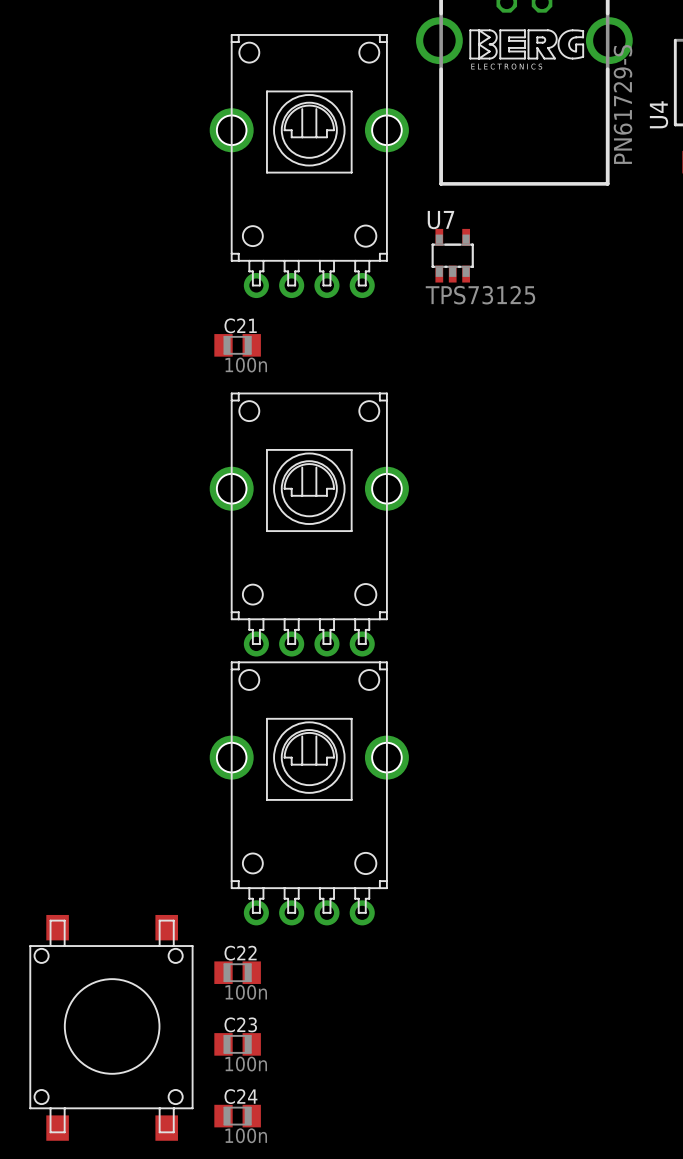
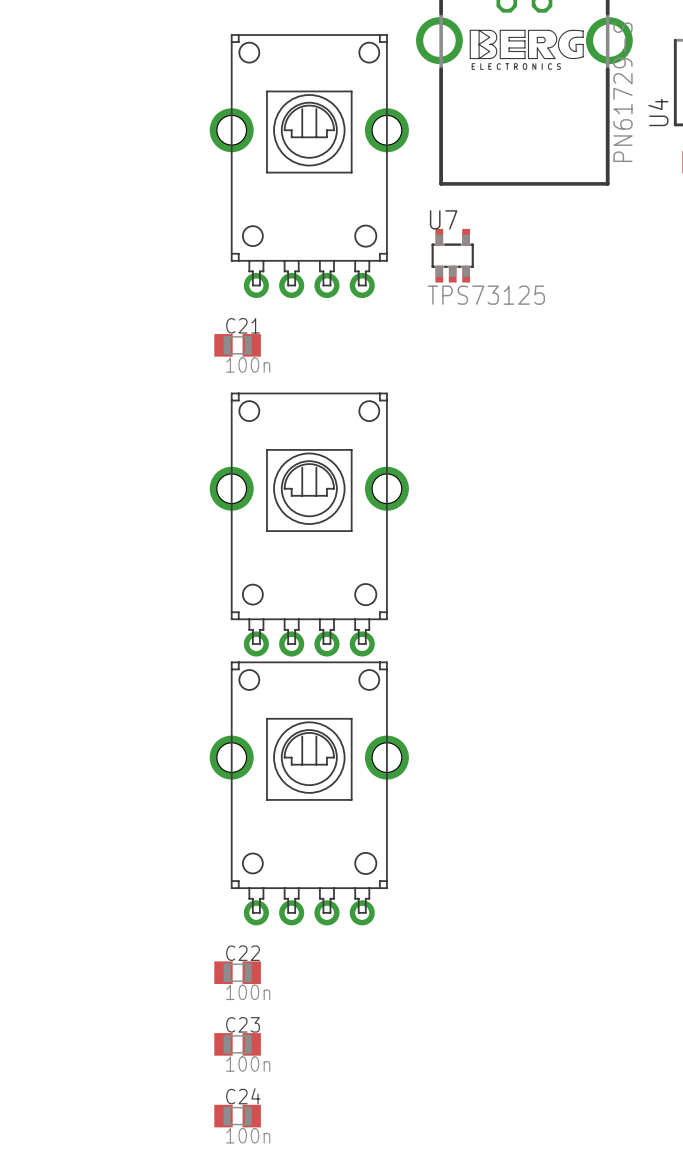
part: (111, 1027) -> none

